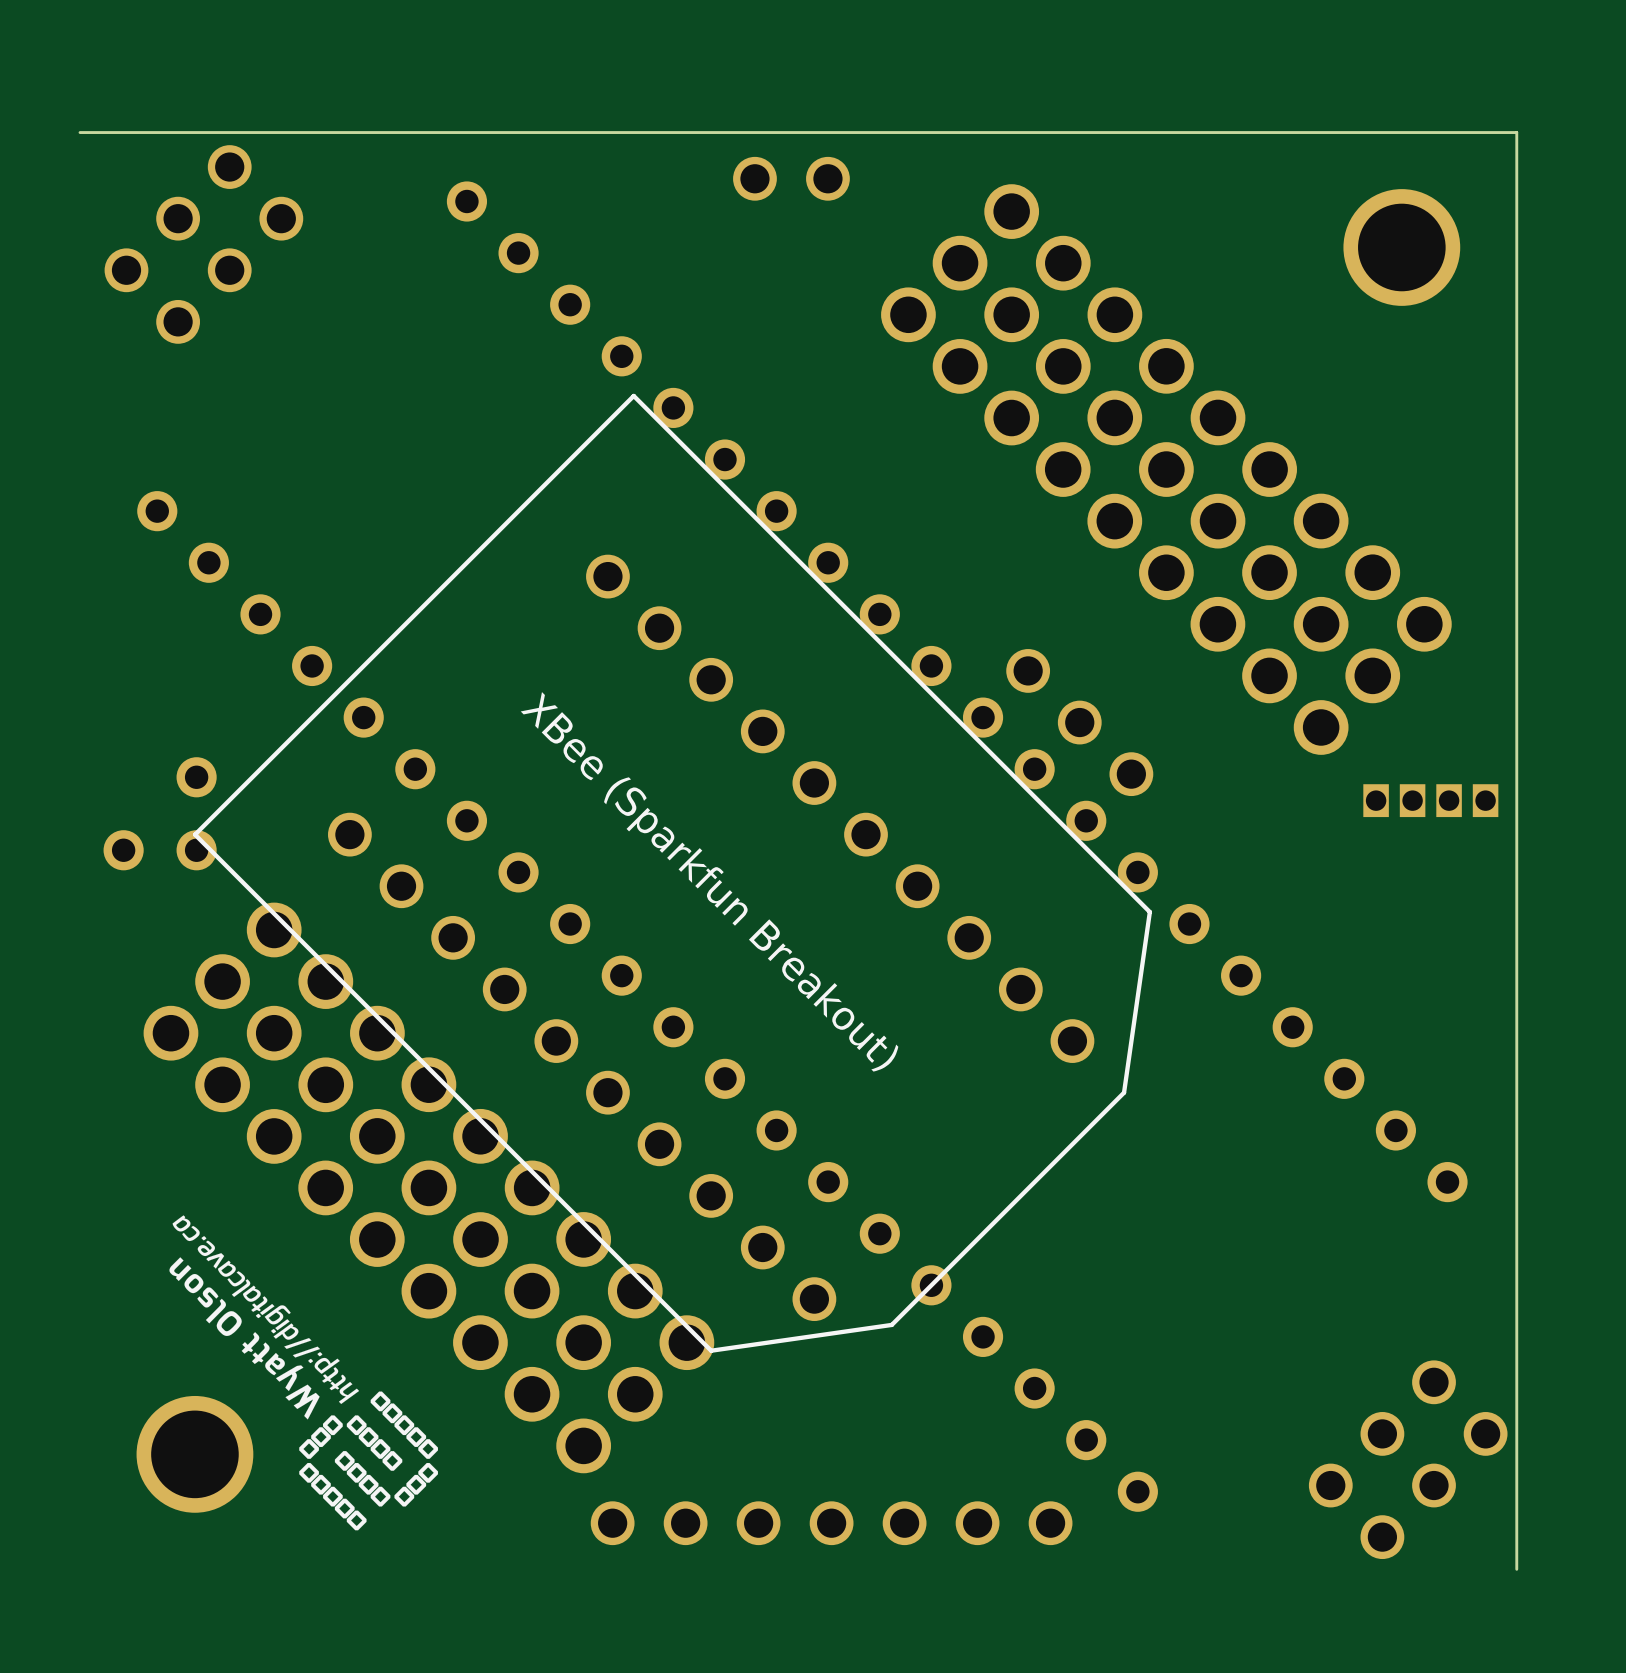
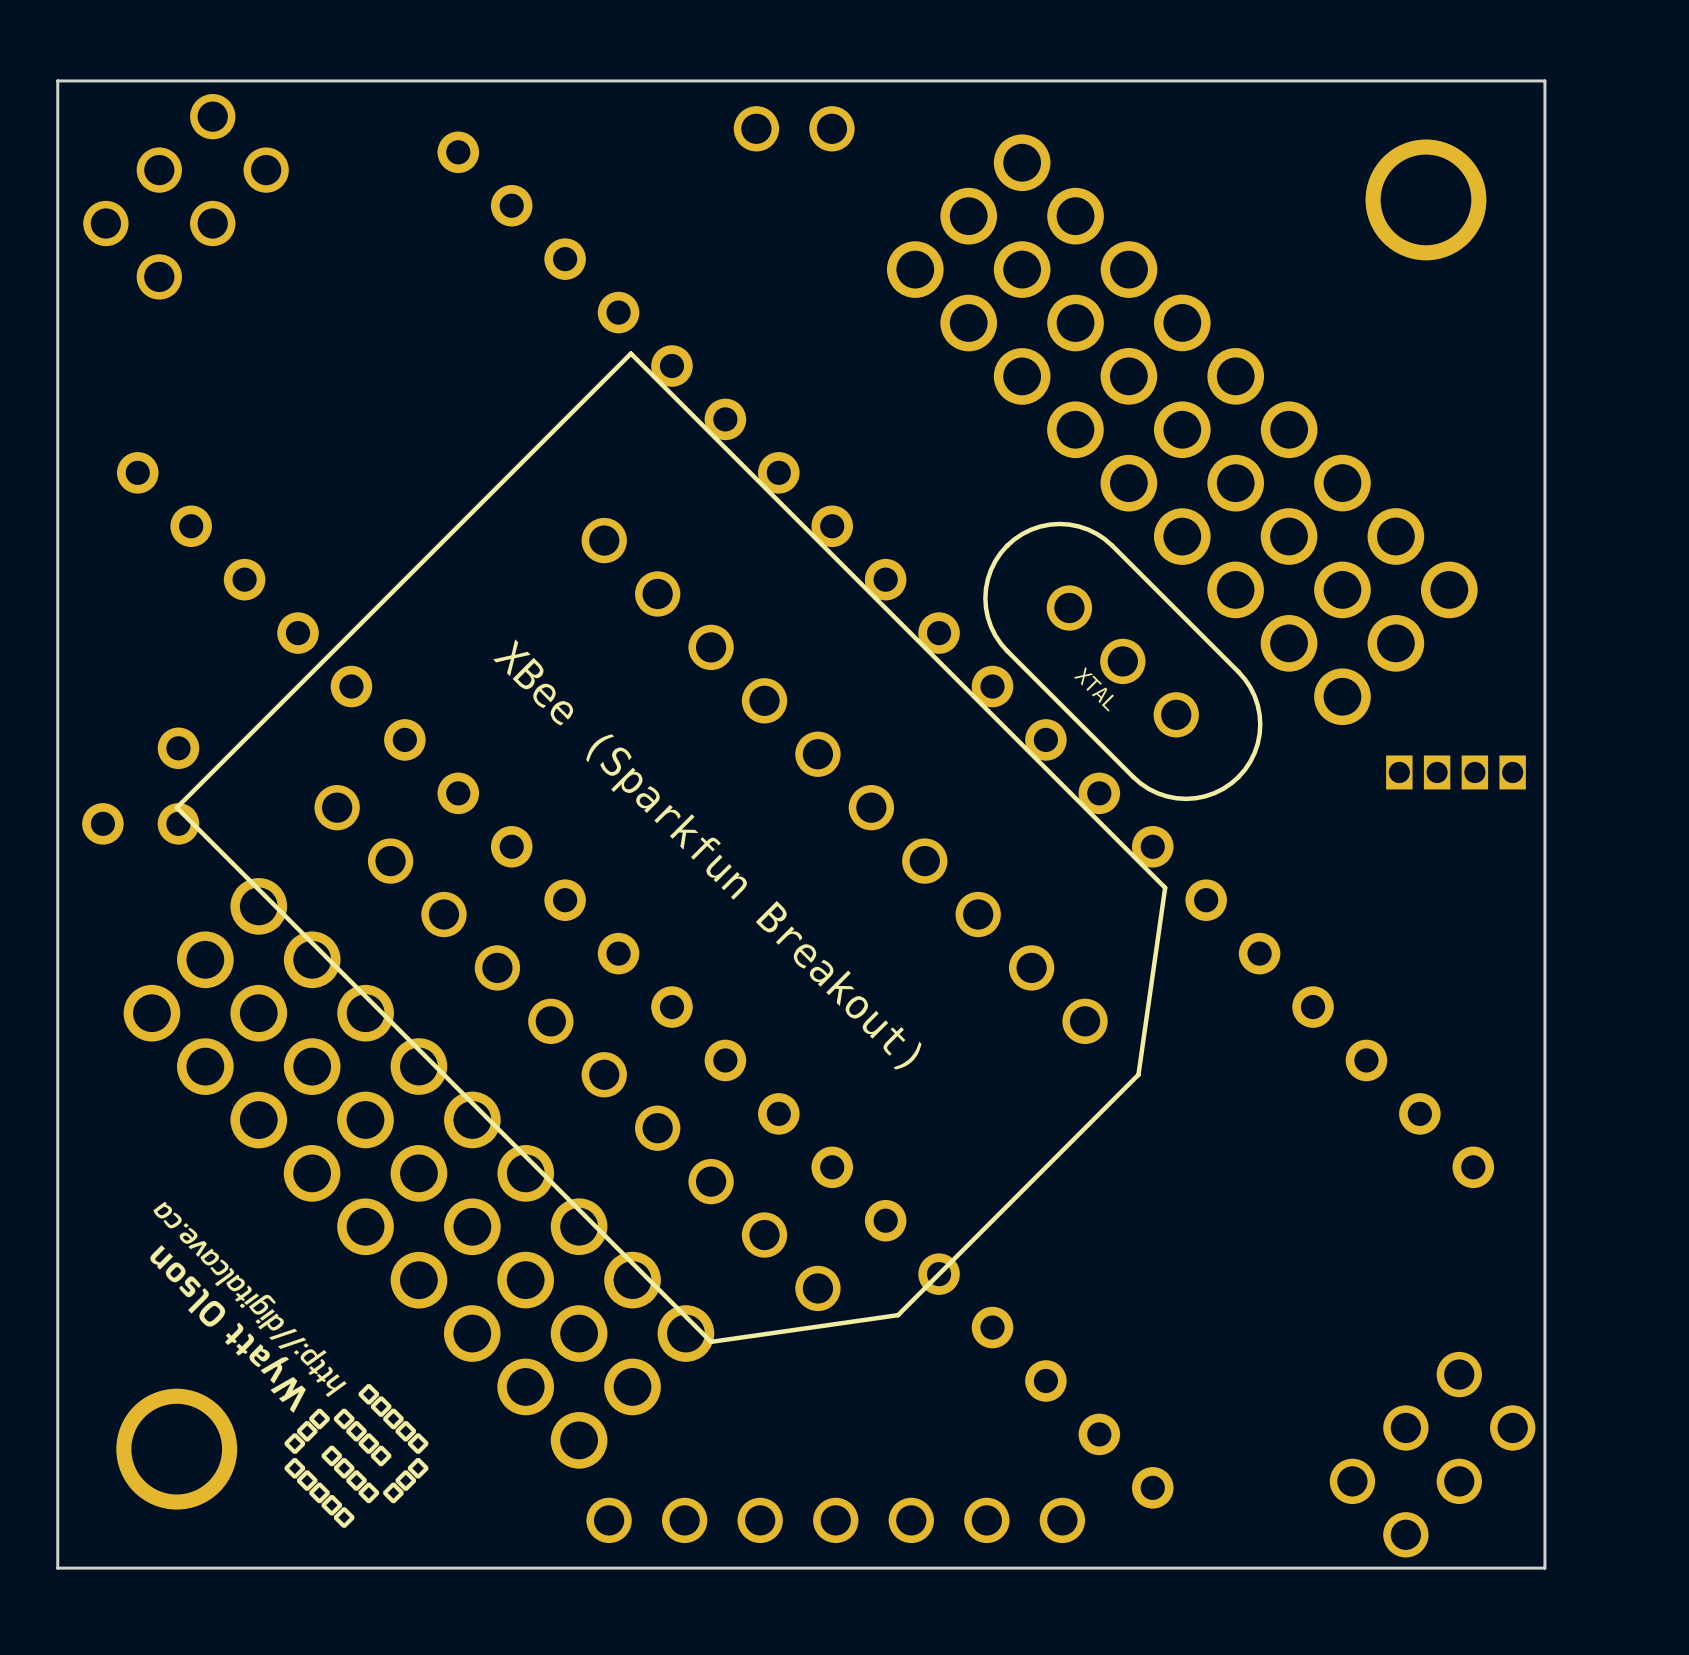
board edge: none -> (57, 80) (57, 1568) (1544, 1568)
part side: top (1079, 722) -> bottom (1122, 661)

